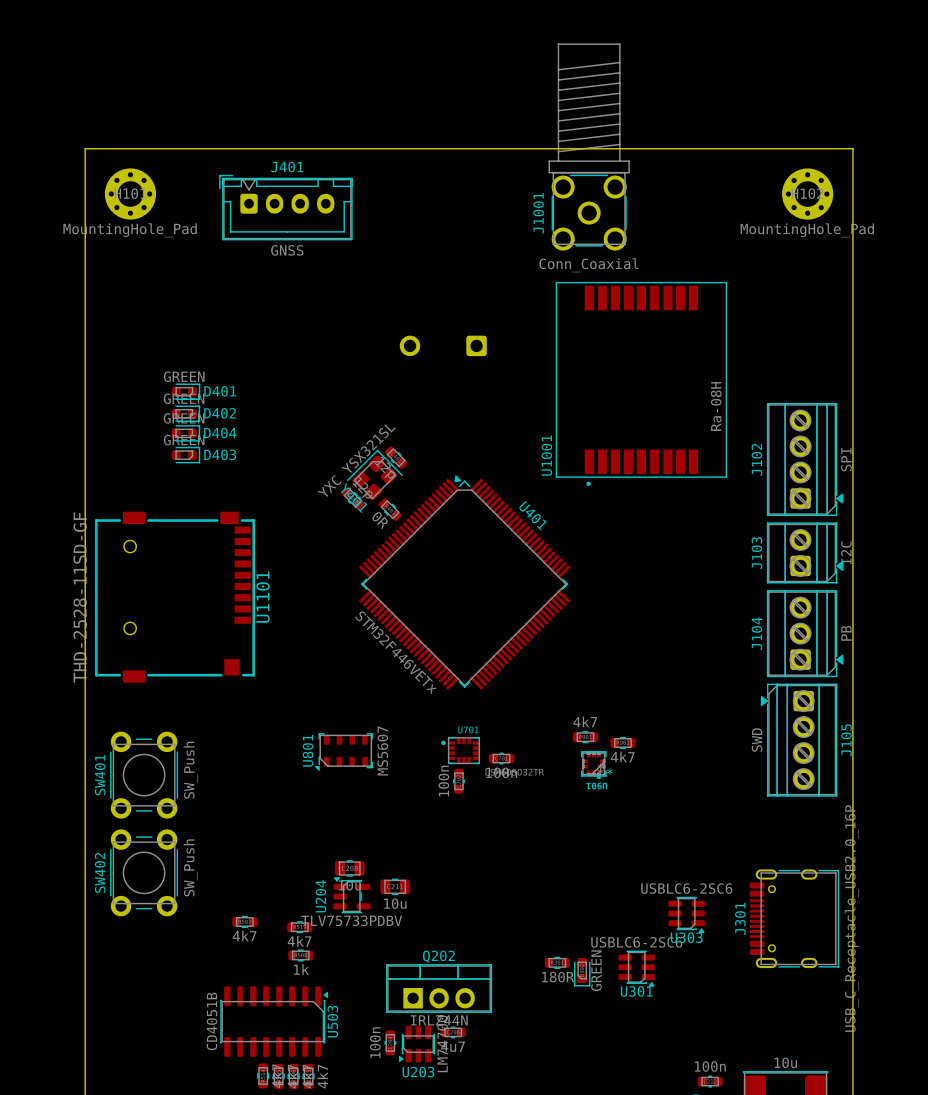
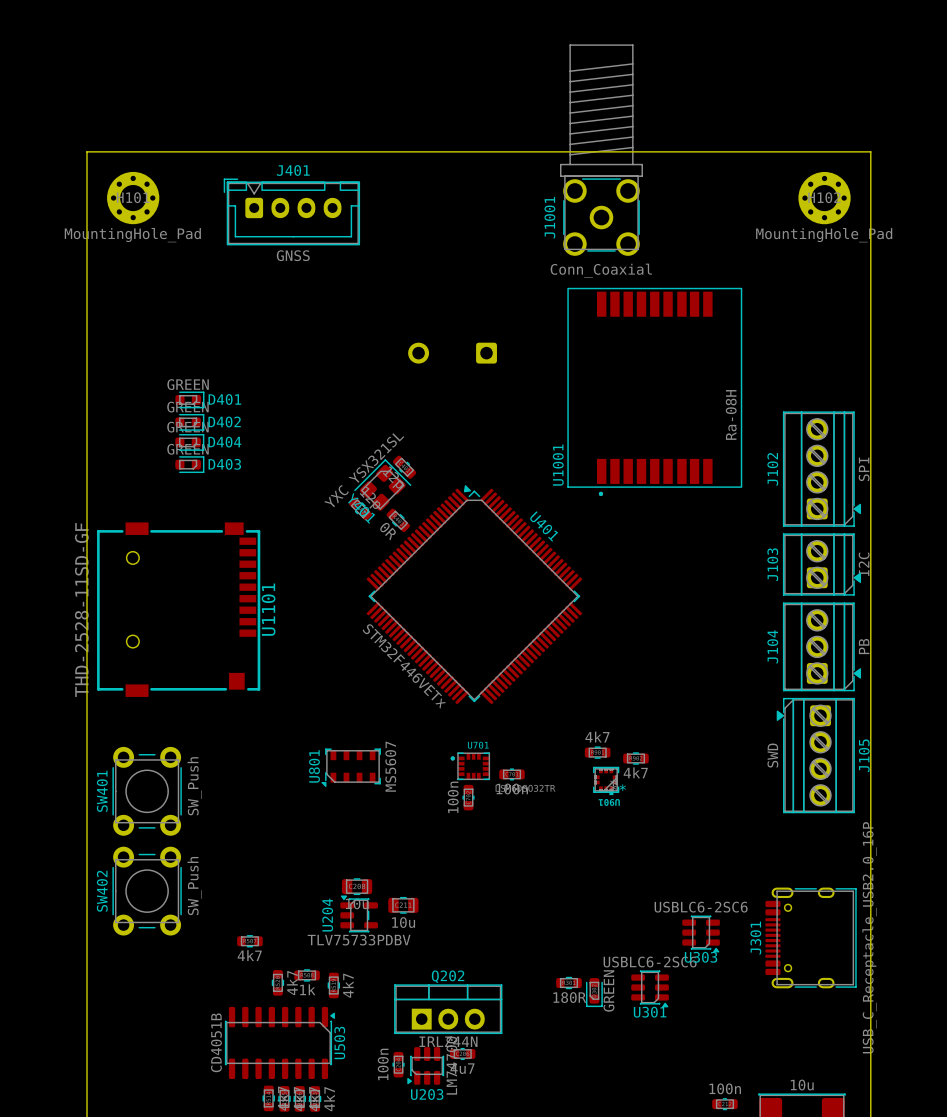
part rotation: 0° (299, 927) -> 90° clockwise (333, 985)
part position: (299, 927) -> (333, 985)
part value position: 4k7 (299, 941) -> 4k7 (348, 985)
part: none -> 4k7 (277, 982)

